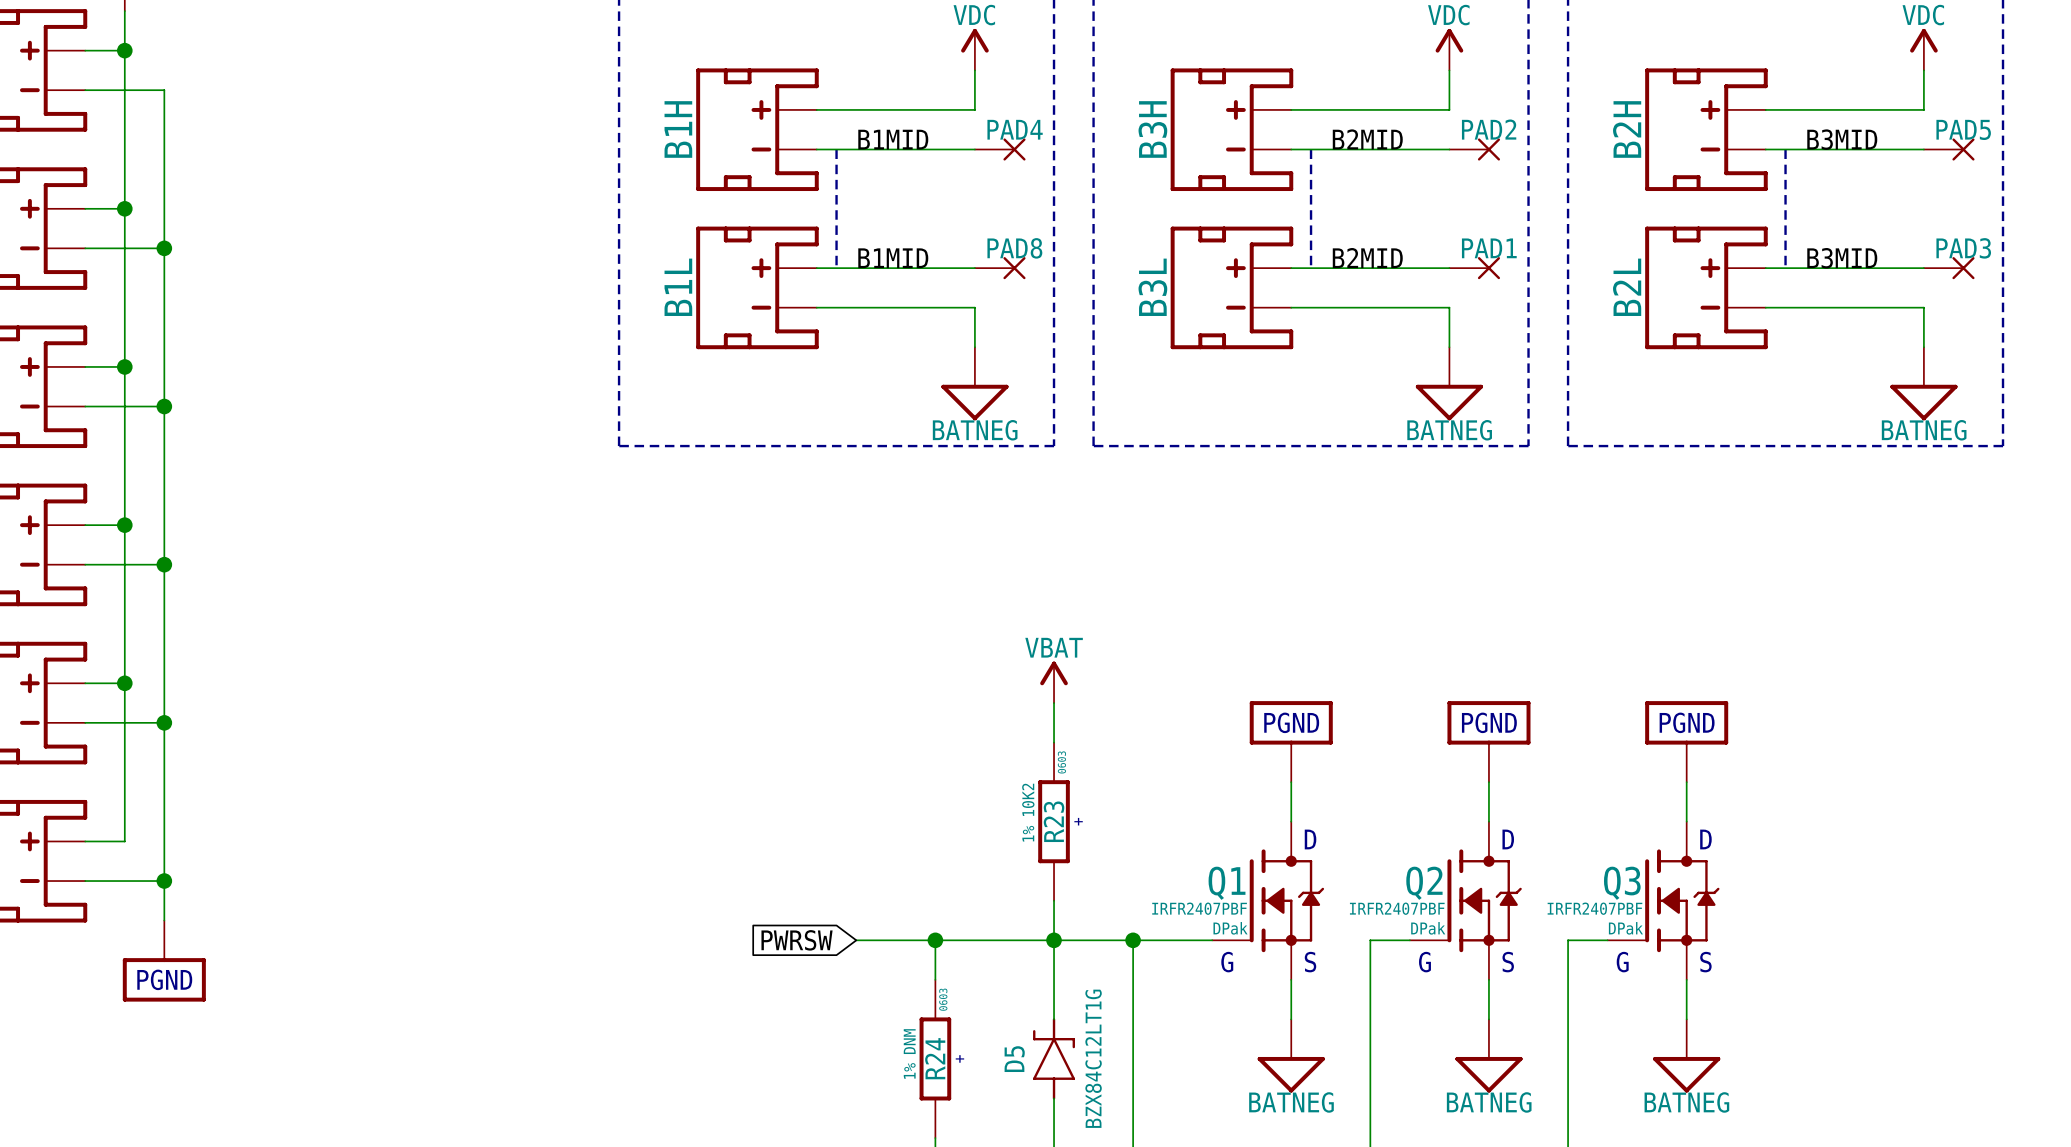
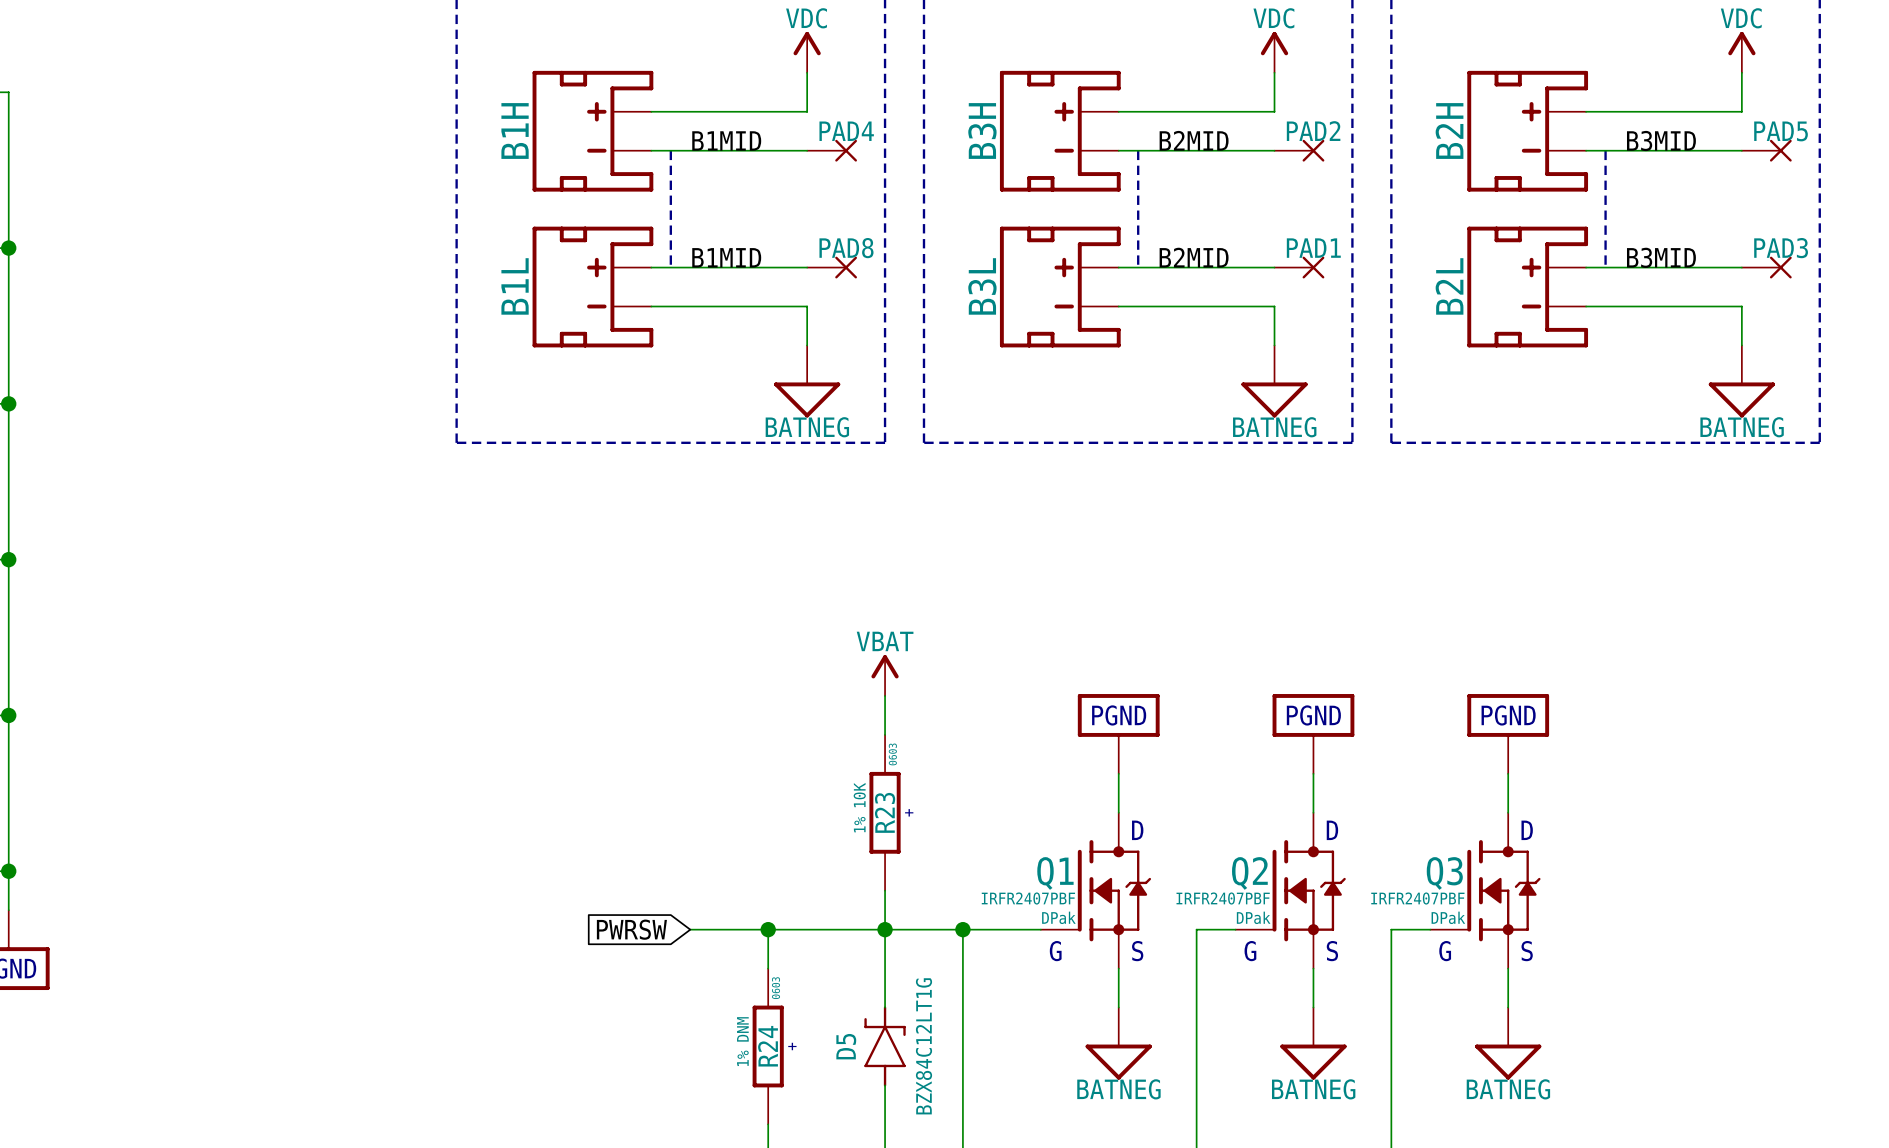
R23 value: 10K2 (1028, 799) -> 10K (859, 795)

